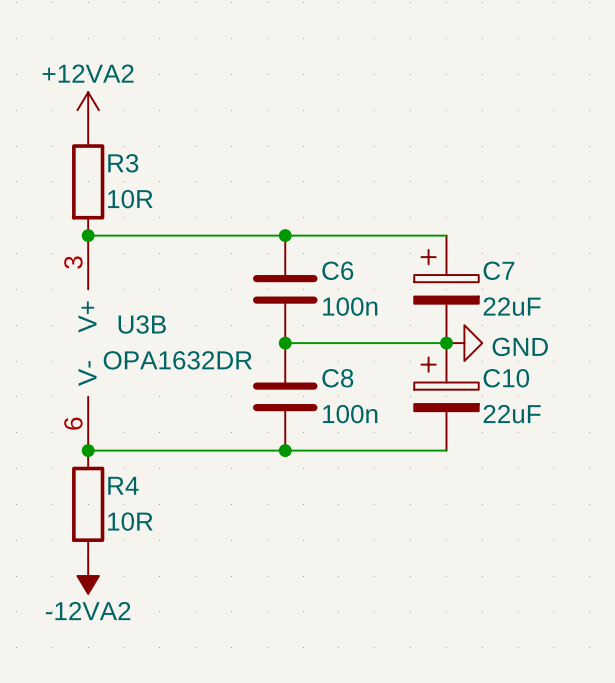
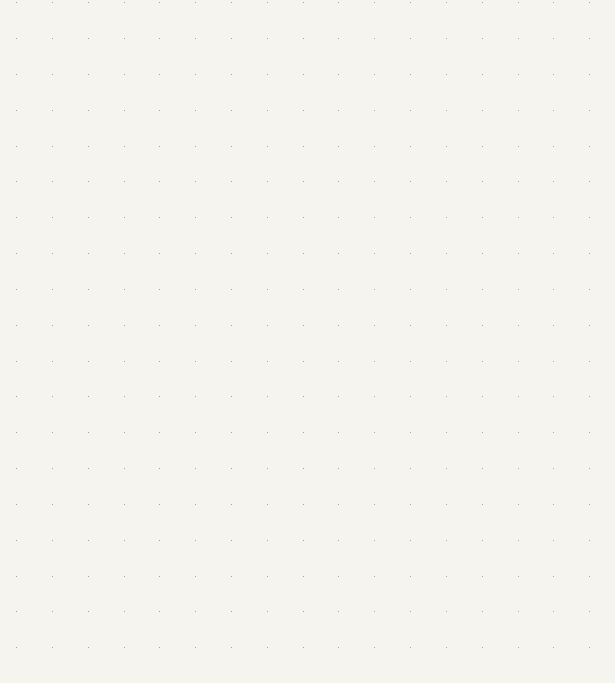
power symbol: +12VA2 (88, 110) -> none
R3: 10R (88, 181) -> none
wire: (88, 235) (446, 235) -> none
junction: (88, 235) -> none
junction: (285, 235) -> none
C6: 100n (285, 289) -> none
C7: 22uF (446, 289) -> none
U3B: OPA1632DR (88, 343) -> none
wire: (285, 343) (446, 343) -> none
junction: (285, 343) -> none
junction: (446, 343) -> none
power symbol: GND (464, 343) -> none
C8: 100n (285, 396) -> none
C10: 22uF (446, 396) -> none
wire: (88, 450) (446, 450) -> none
junction: (88, 450) -> none
junction: (285, 450) -> none
R4: 10R (88, 504) -> none
power symbol: -12VA2 (88, 576) -> none

